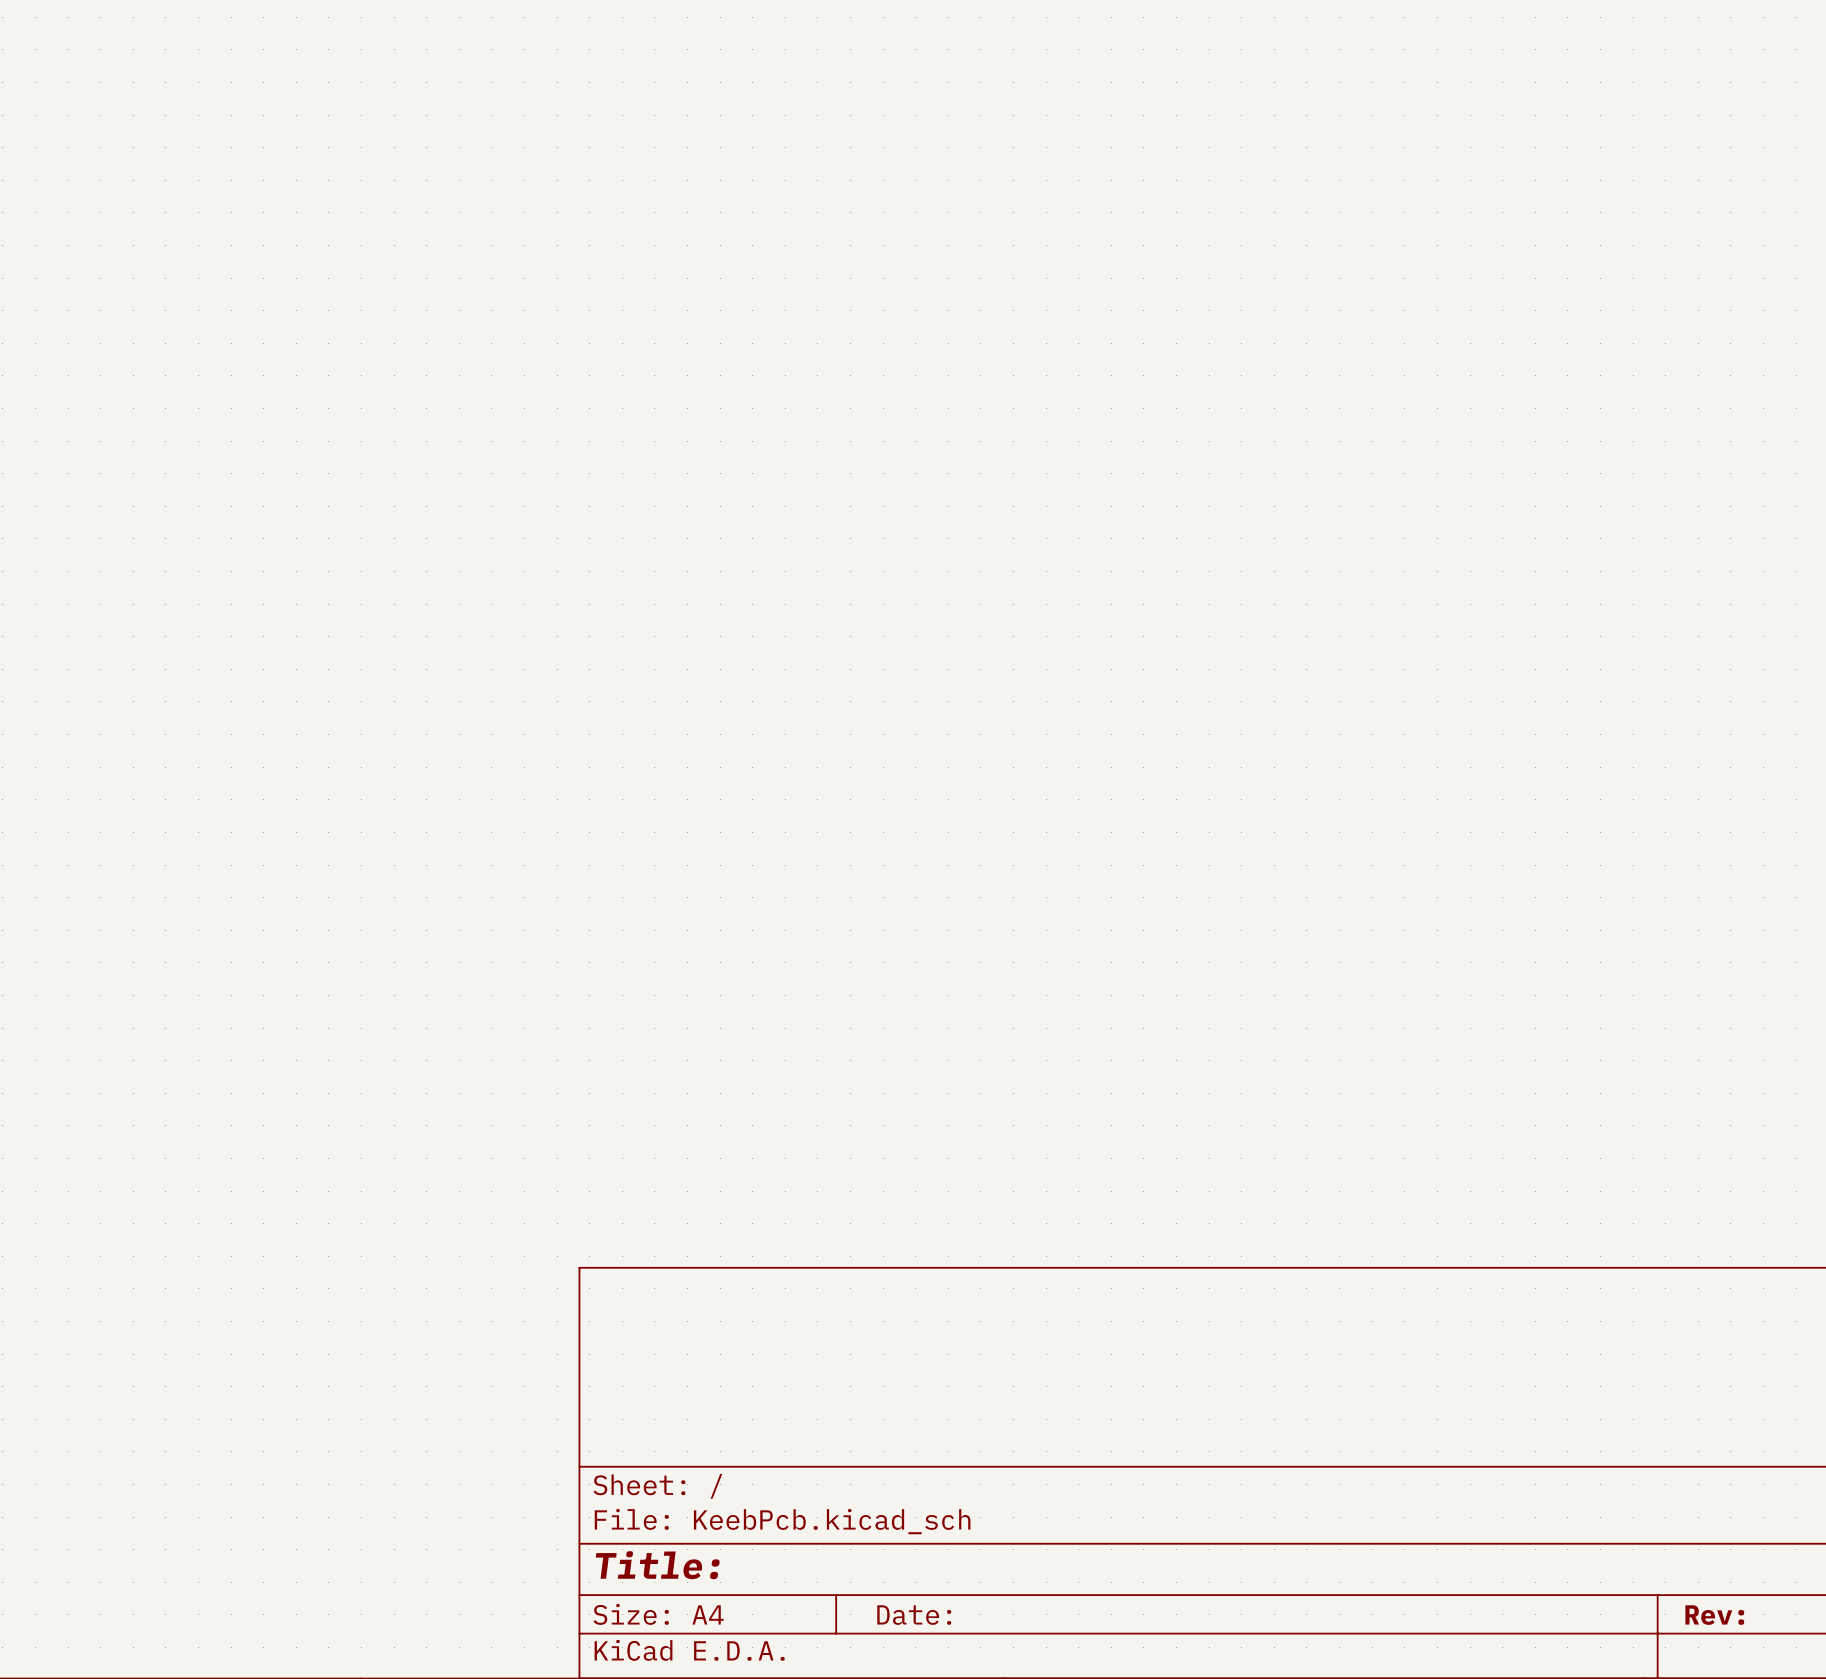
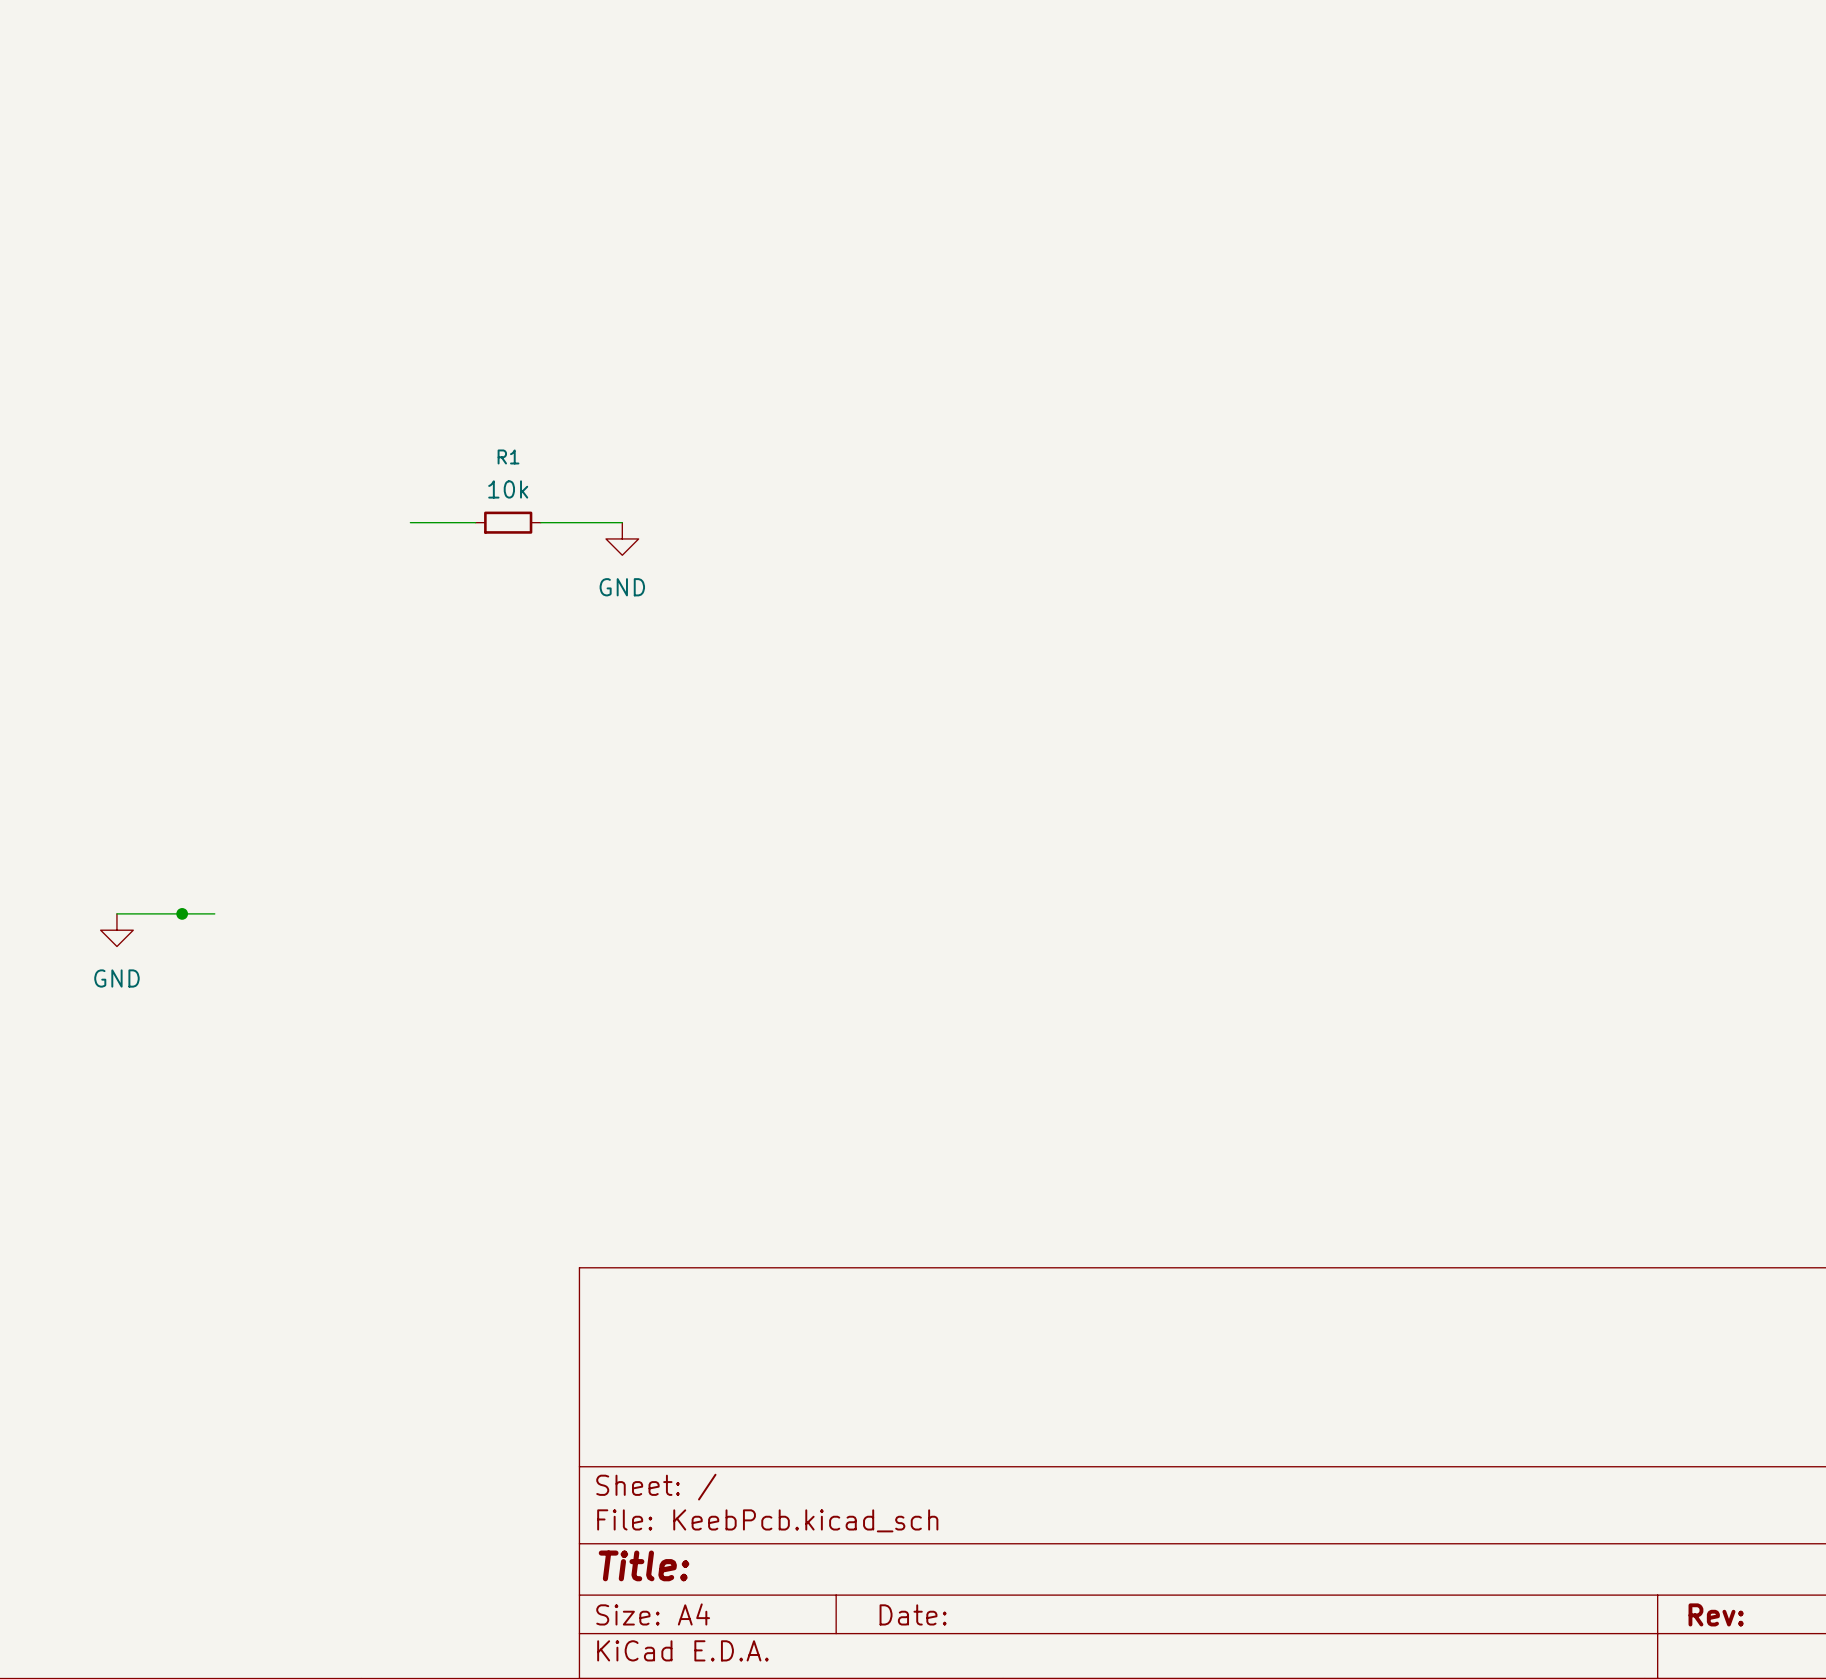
wire: none -> (410, 522) (475, 522)
R1: none -> 10k (508, 522)
wire: none -> (540, 522) (622, 522)
power symbol: none -> GND (622, 538)
wire: none -> (116, 913) (214, 913)
junction: none -> (182, 913)
power symbol: none -> GND (116, 930)

